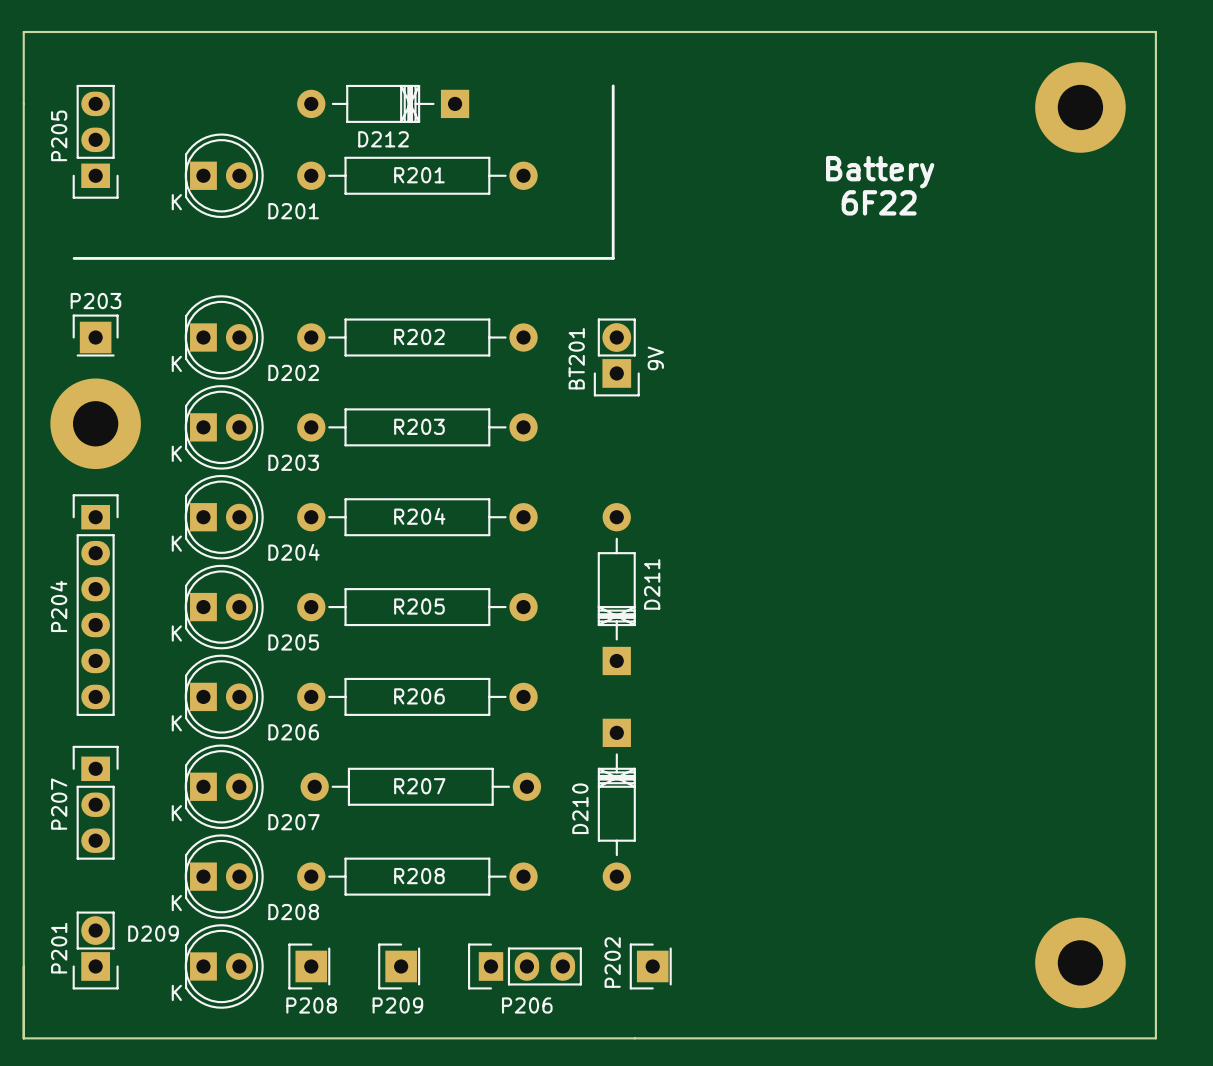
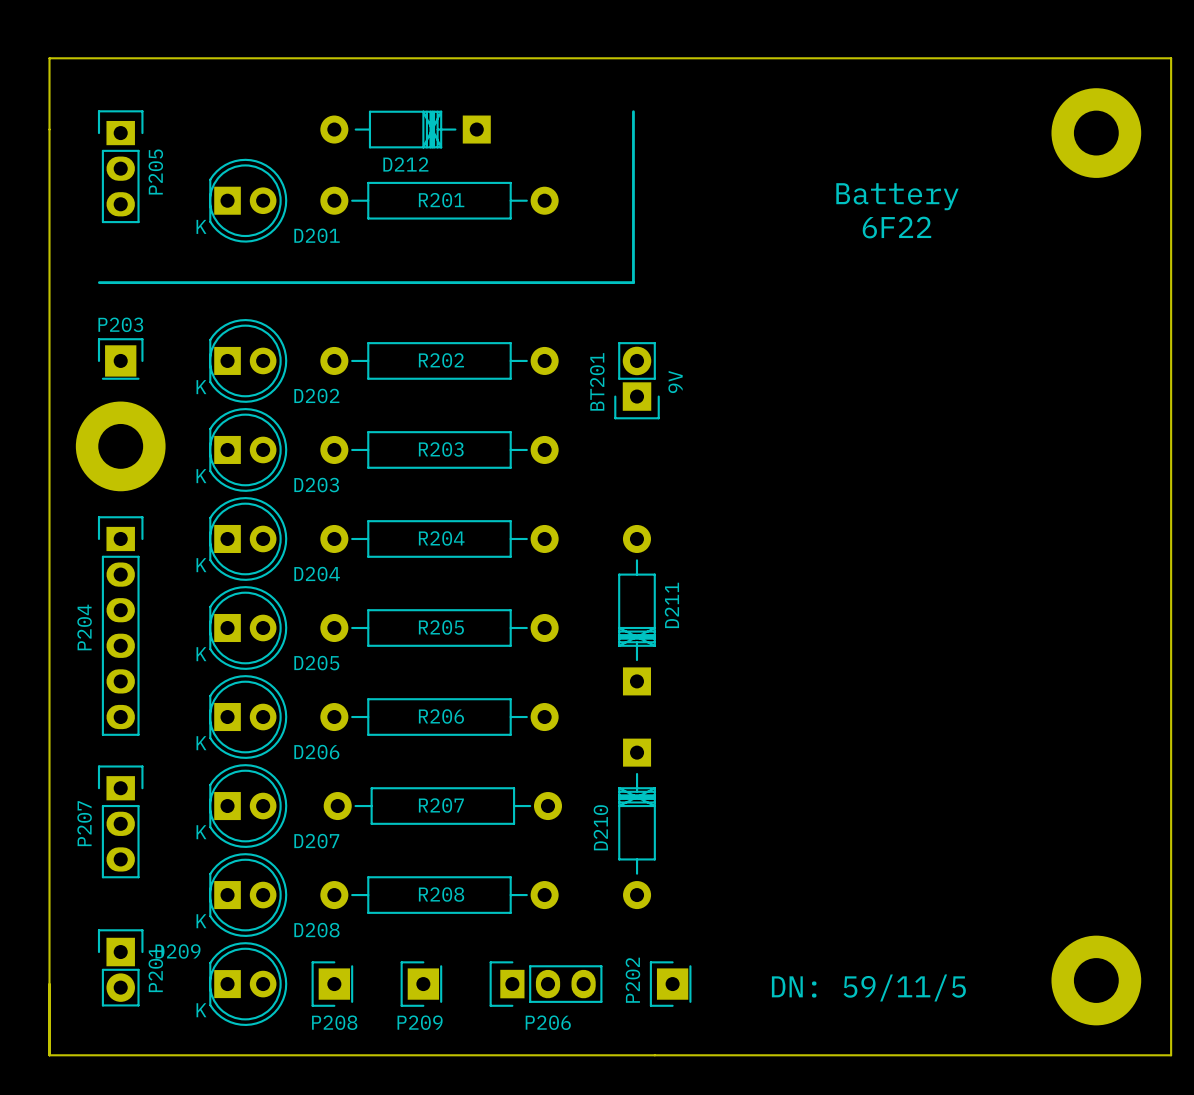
P205 rotation: 0° (95, 141) -> 180° (120, 166)
P201 rotation: 0° (95, 950) -> 180° (120, 967)
text: none -> DN: 59/11/5 (868, 987)

